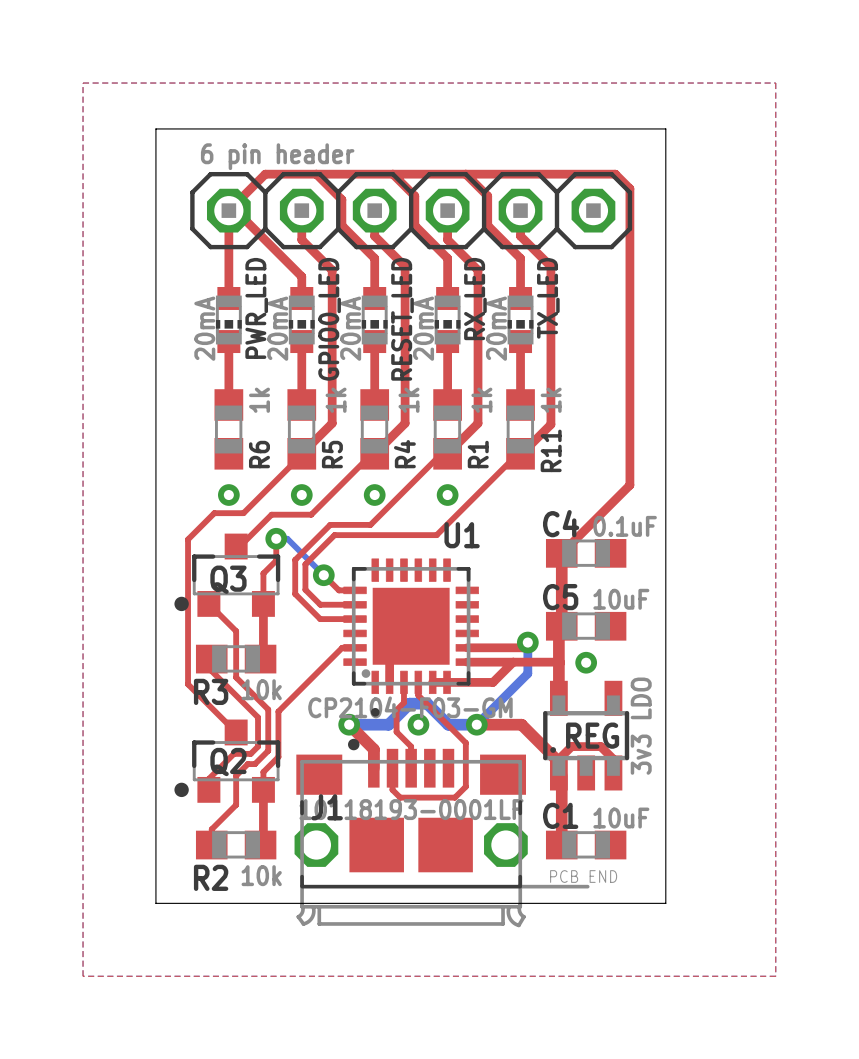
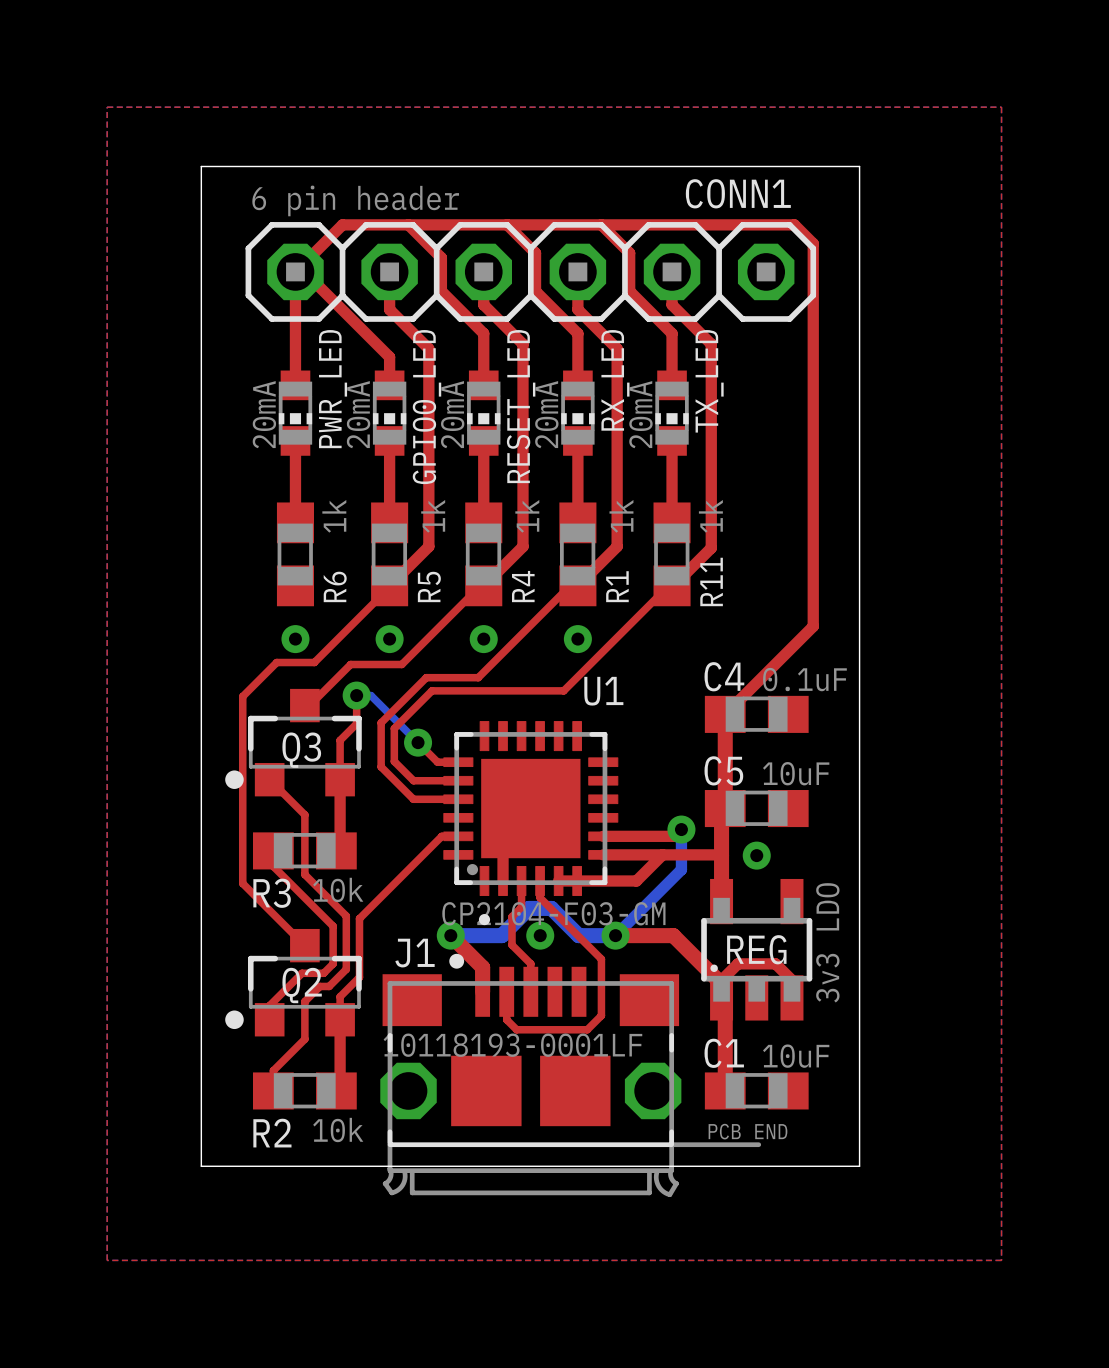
CONN1 name: none -> CONN1 (738, 193)
J1 name position: J1 (327, 807) -> J1 (415, 953)

